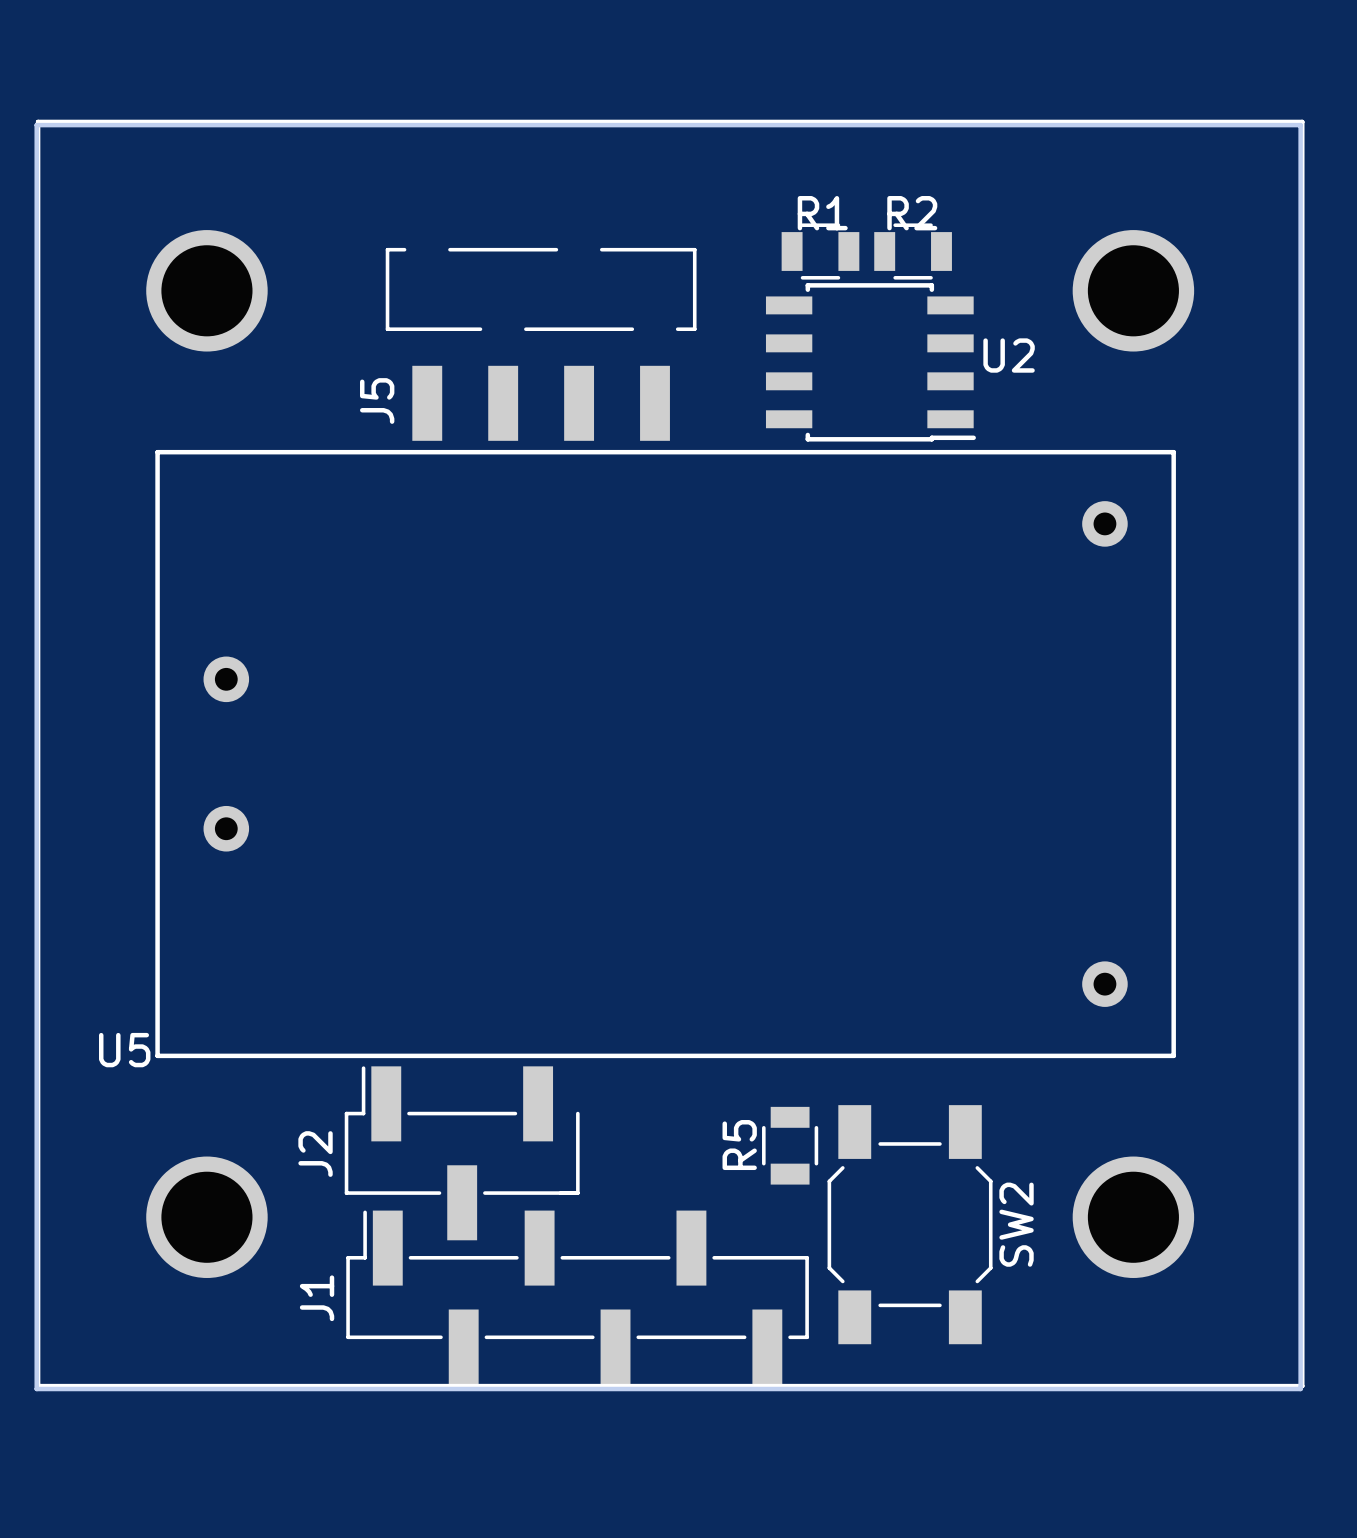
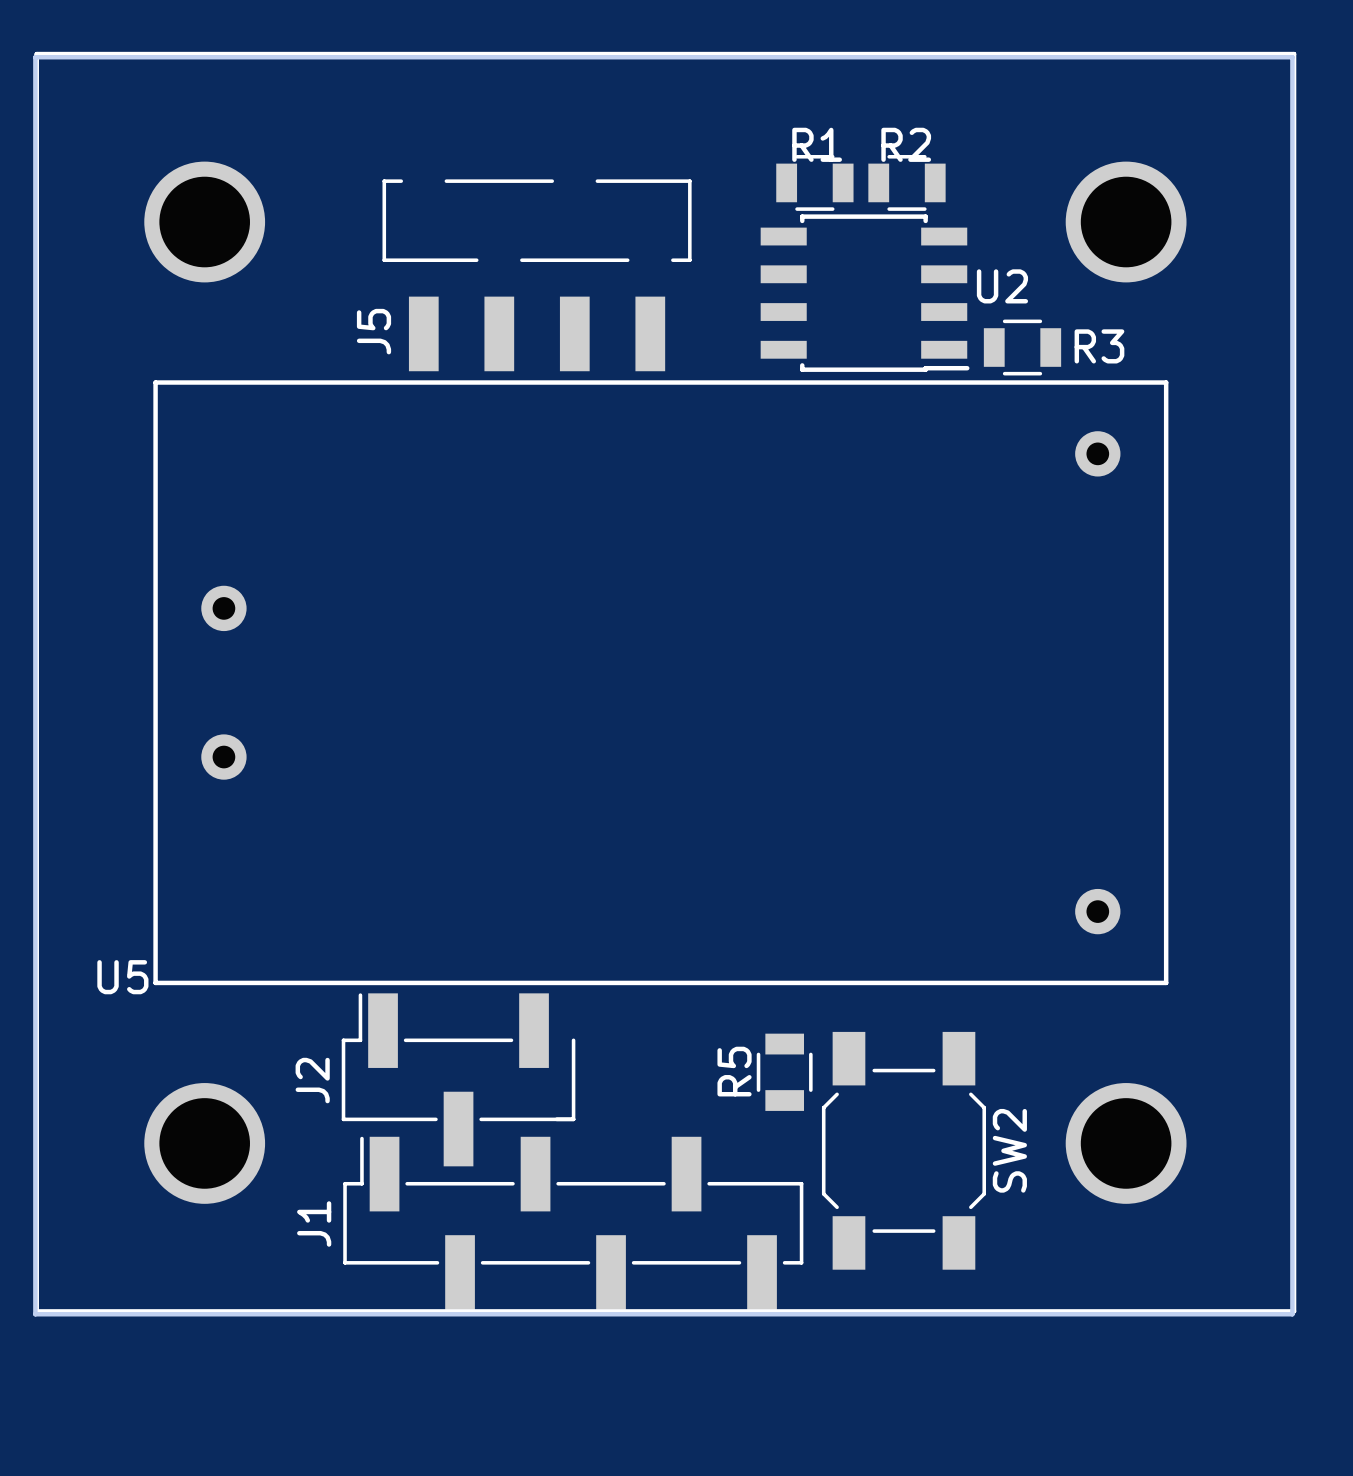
R3: none -> (1022, 347)

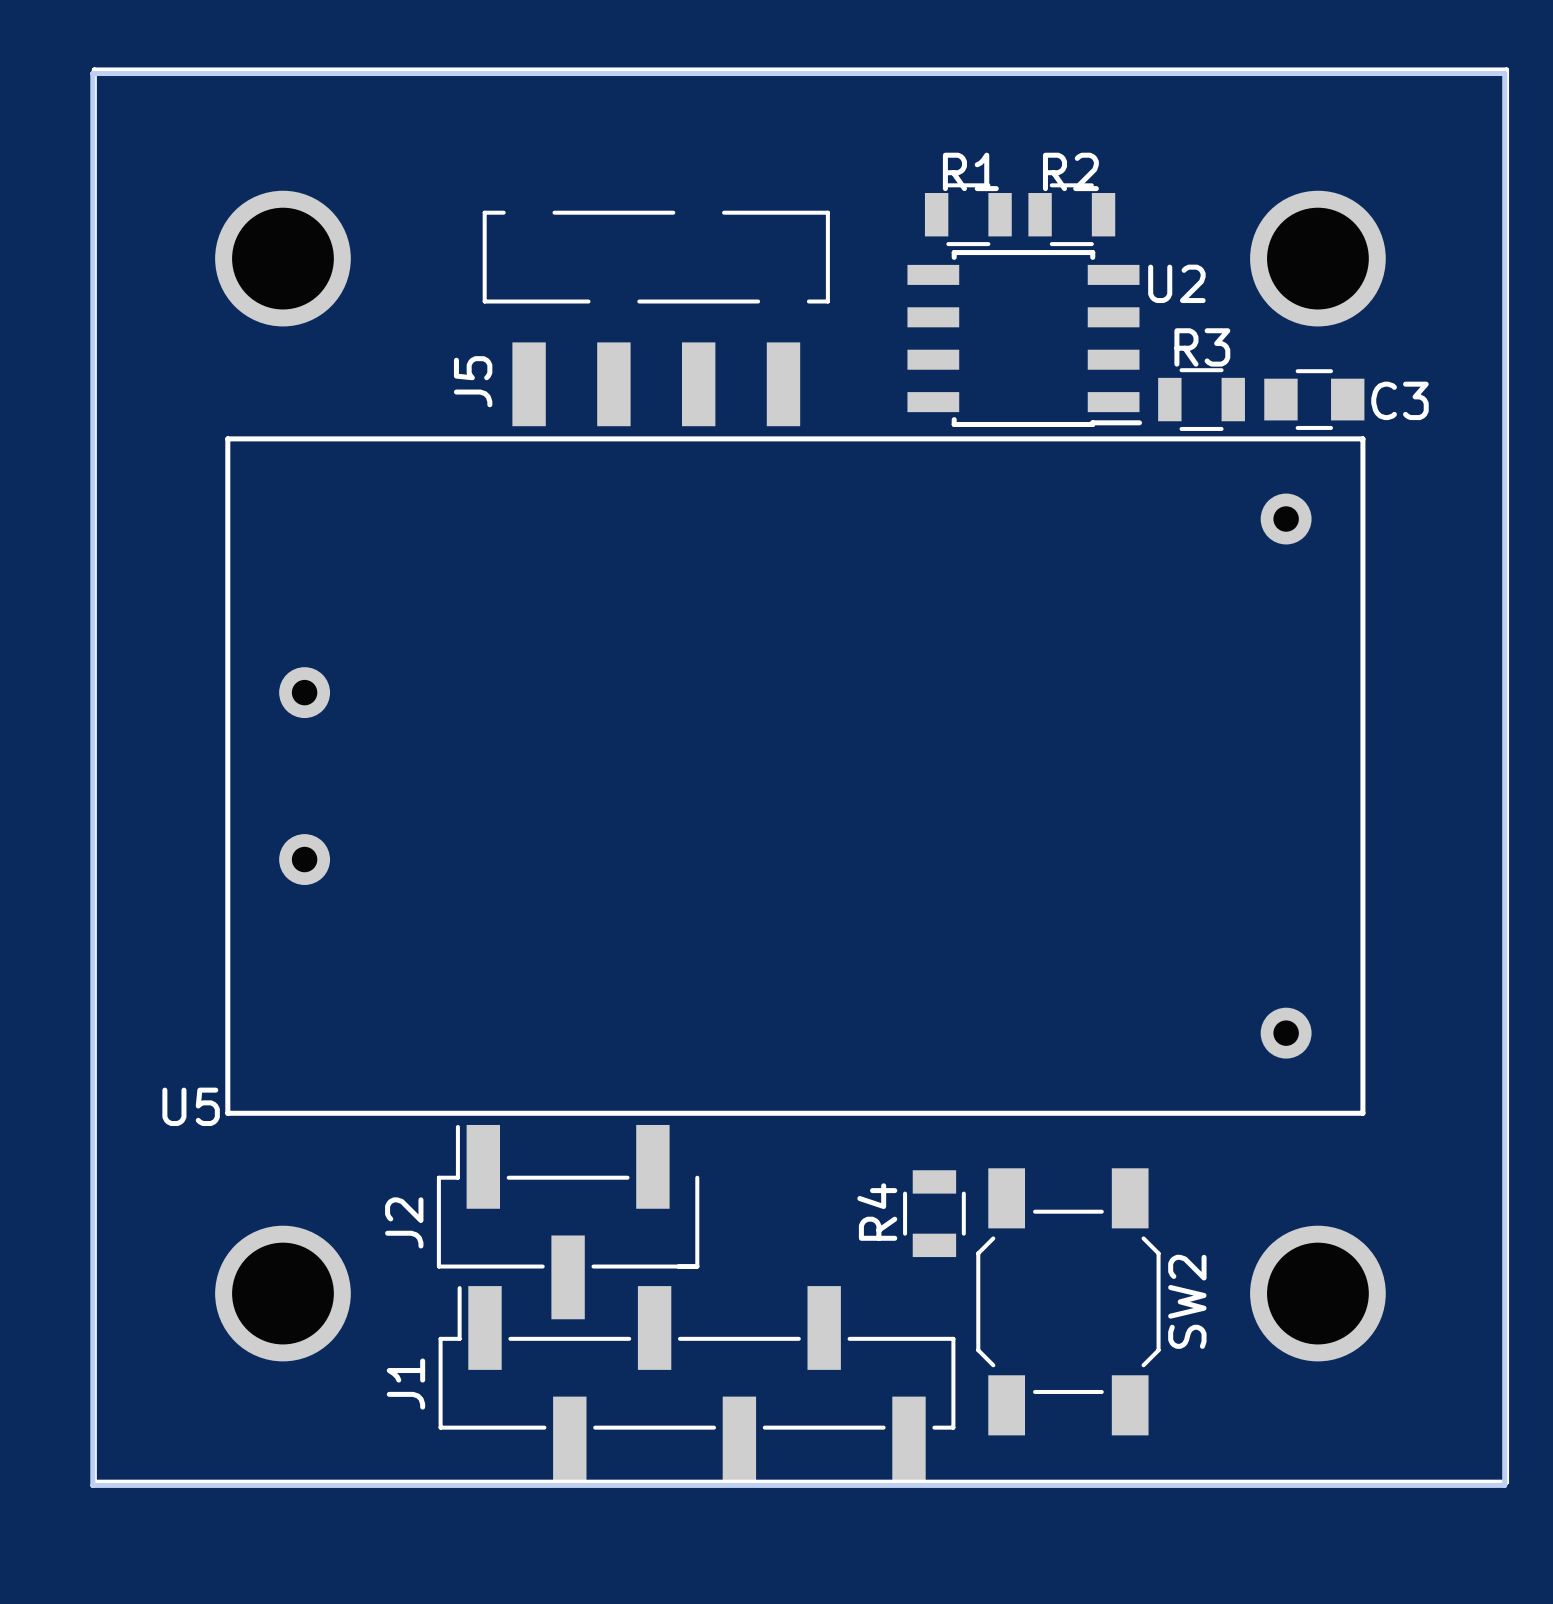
U2 name position: U2 (1002, 286) -> U2 (1176, 283)
R3 name position: R3 (1099, 346) -> R3 (1202, 347)
C3: none -> (1314, 399)
R5 name: R5 (734, 1071) -> R4 (877, 1212)

